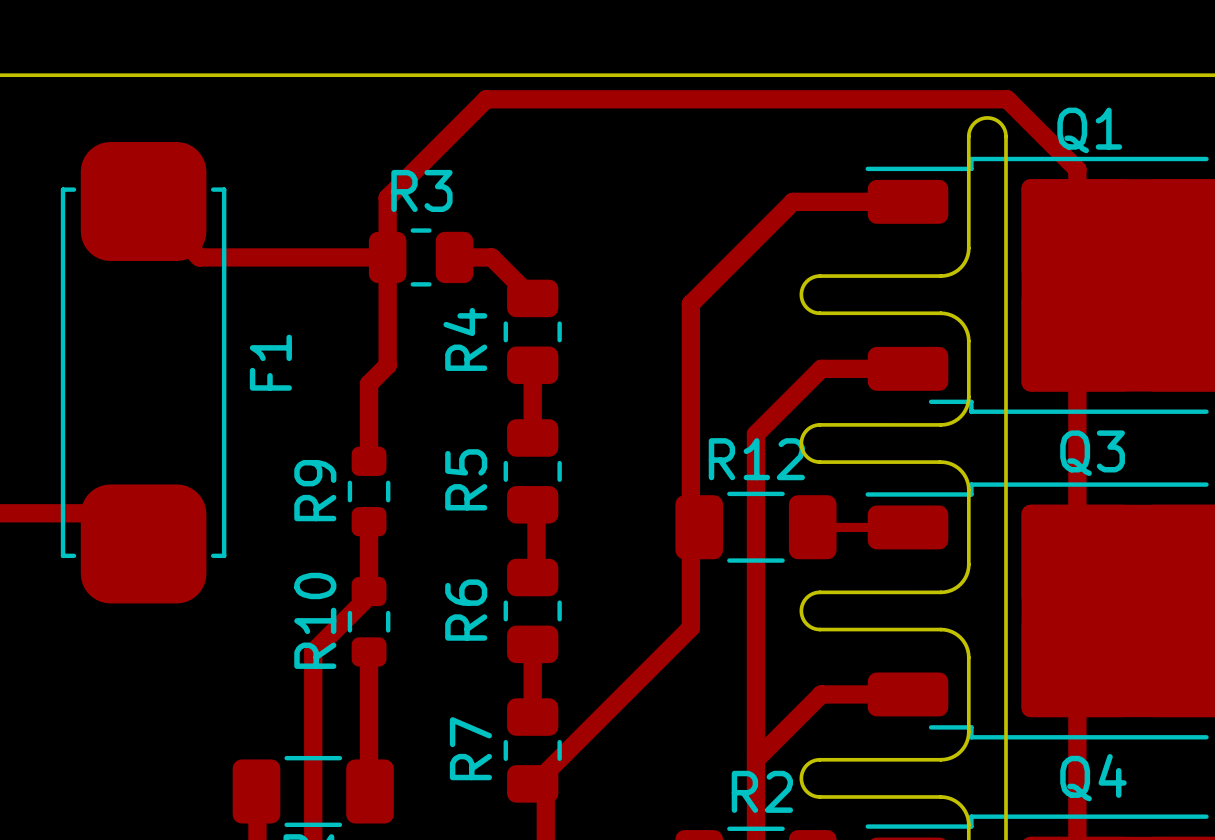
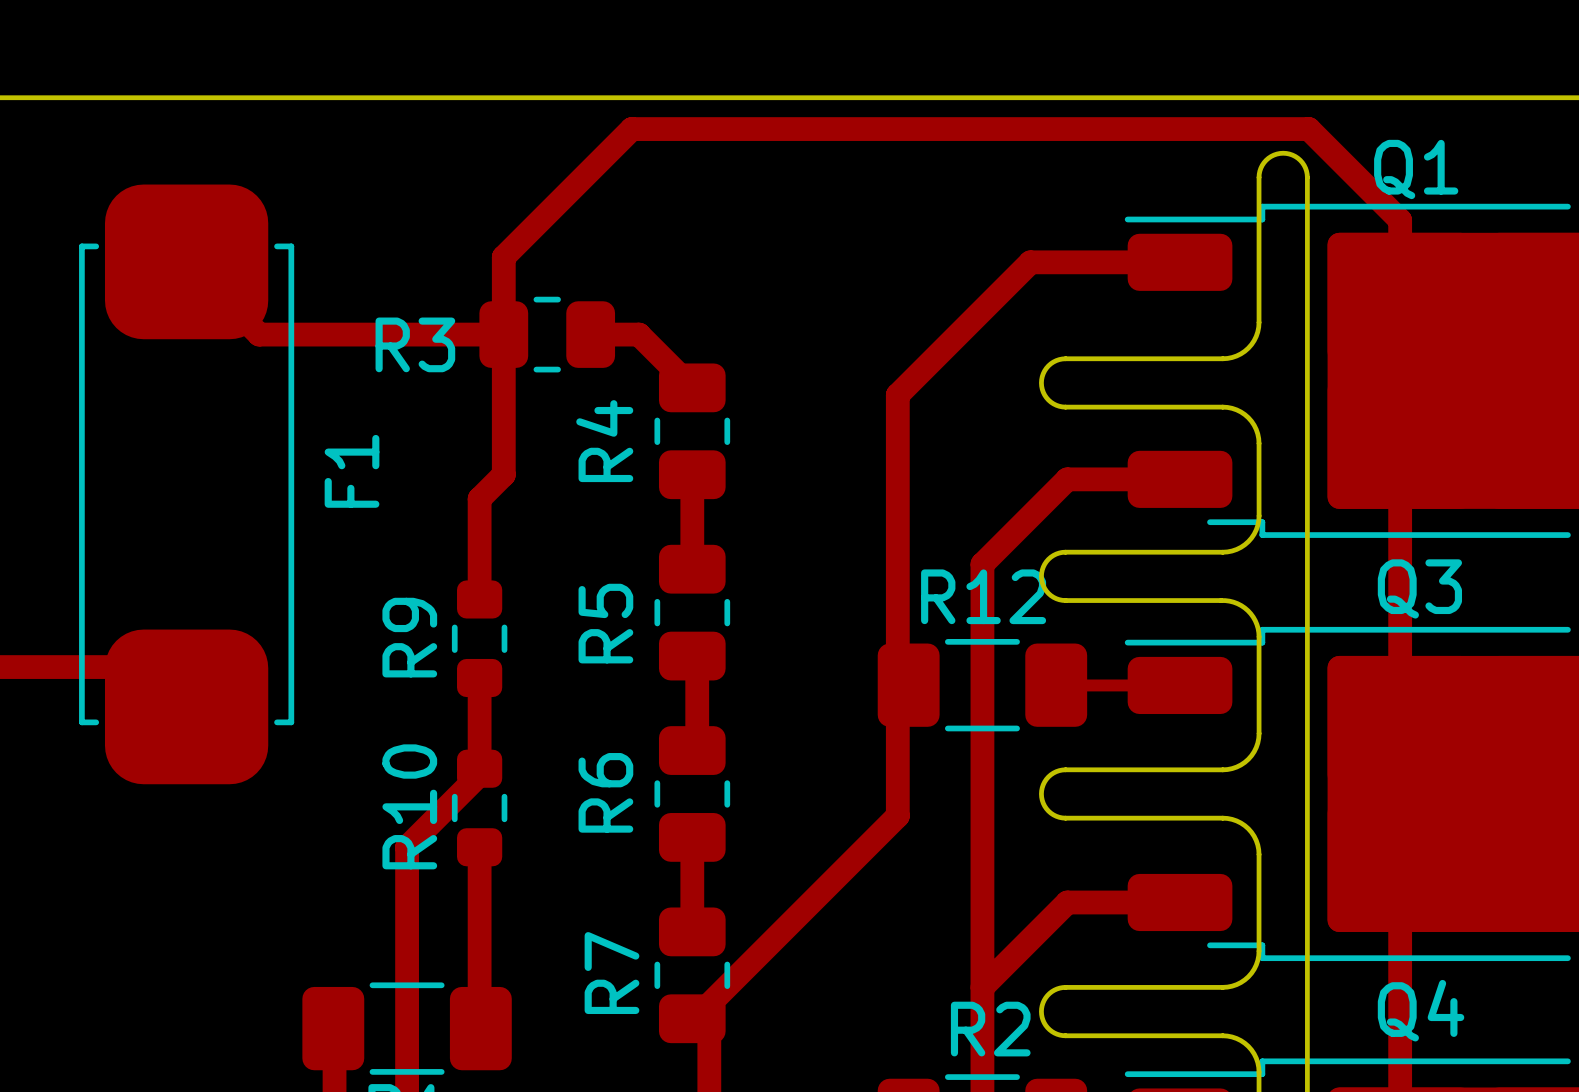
R3 name position: R3 (421, 190) -> R3 (415, 344)

